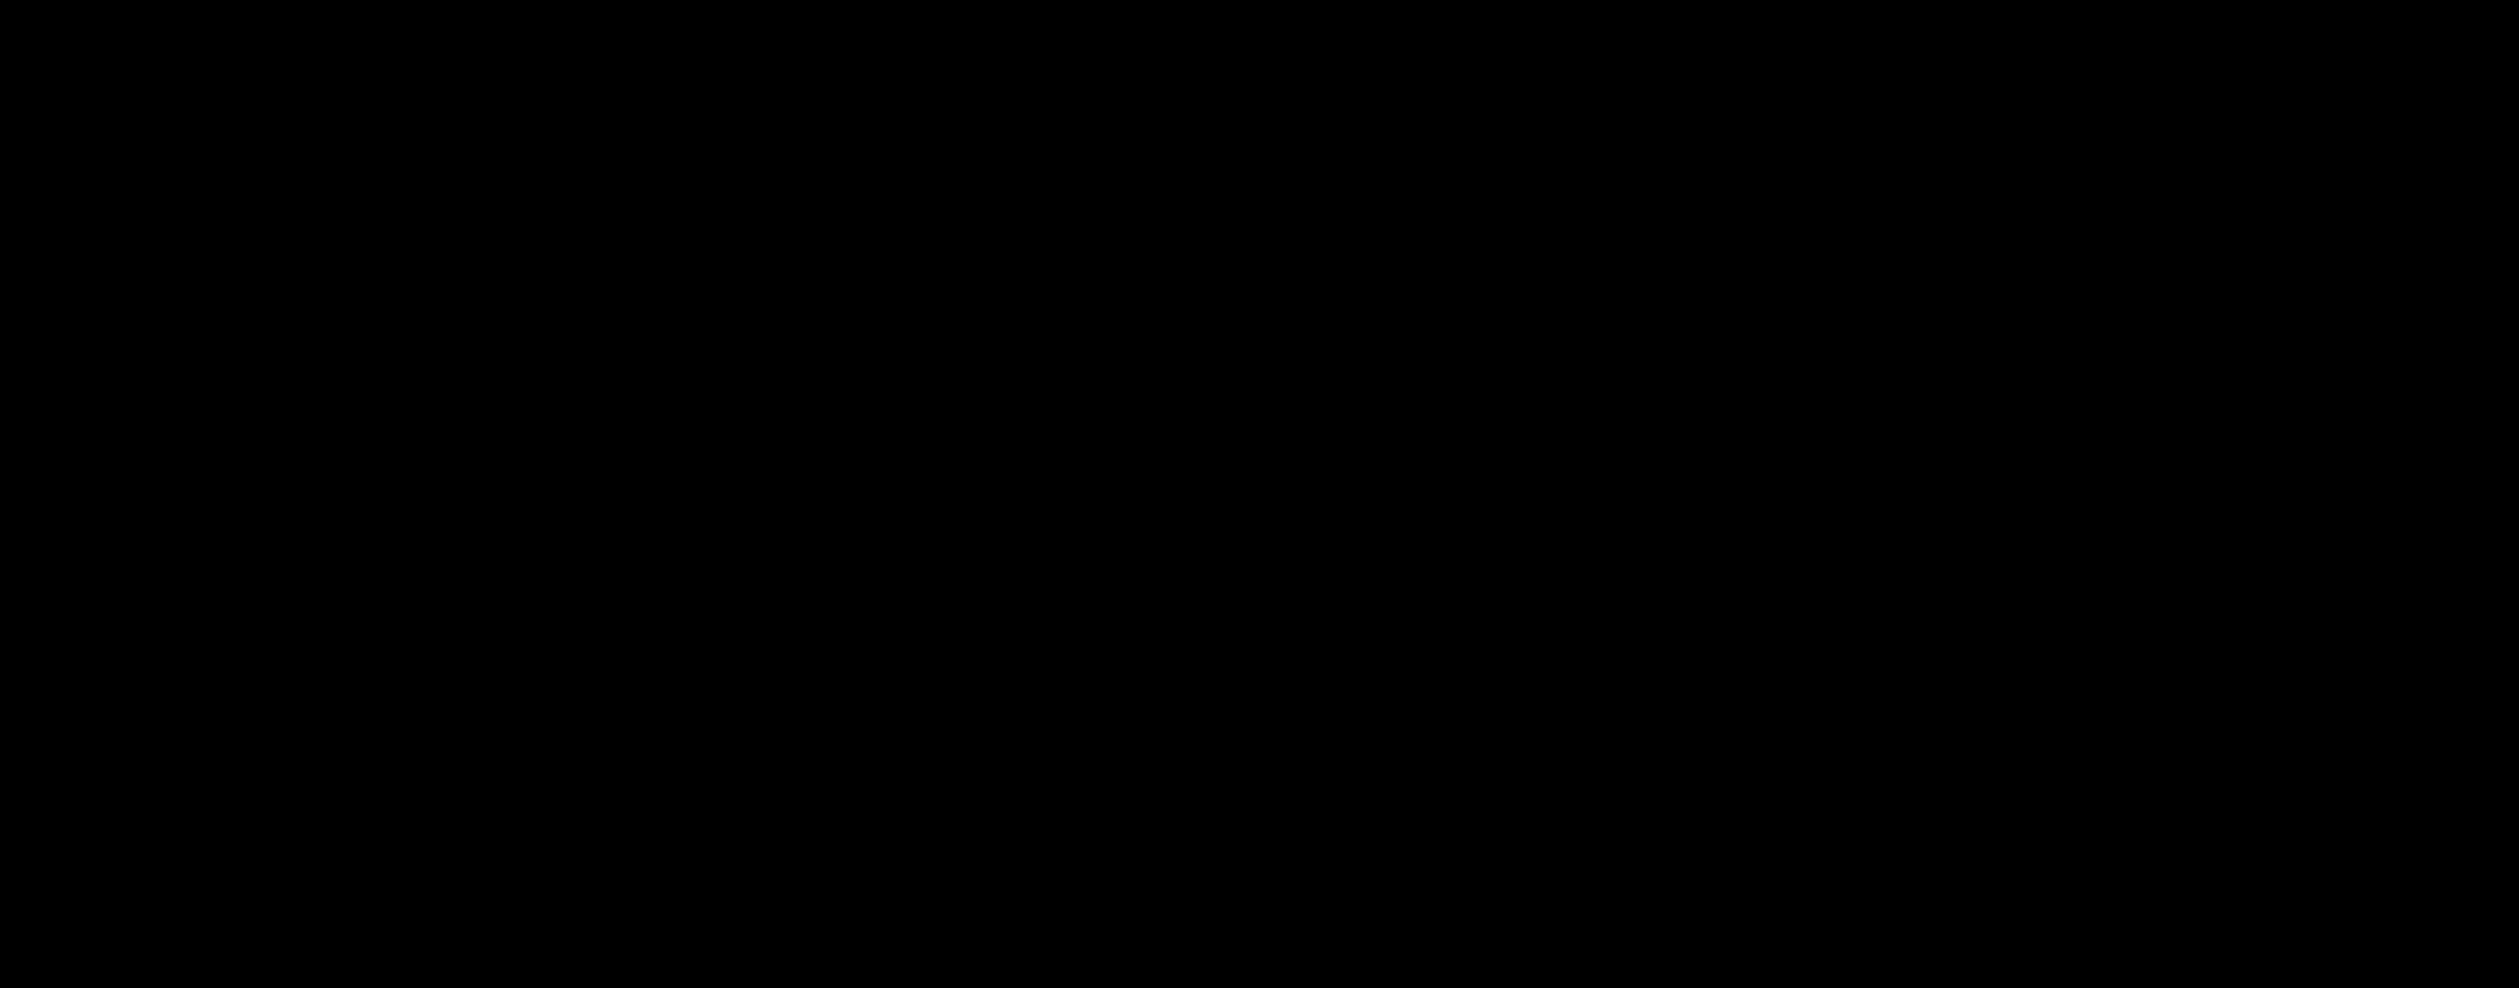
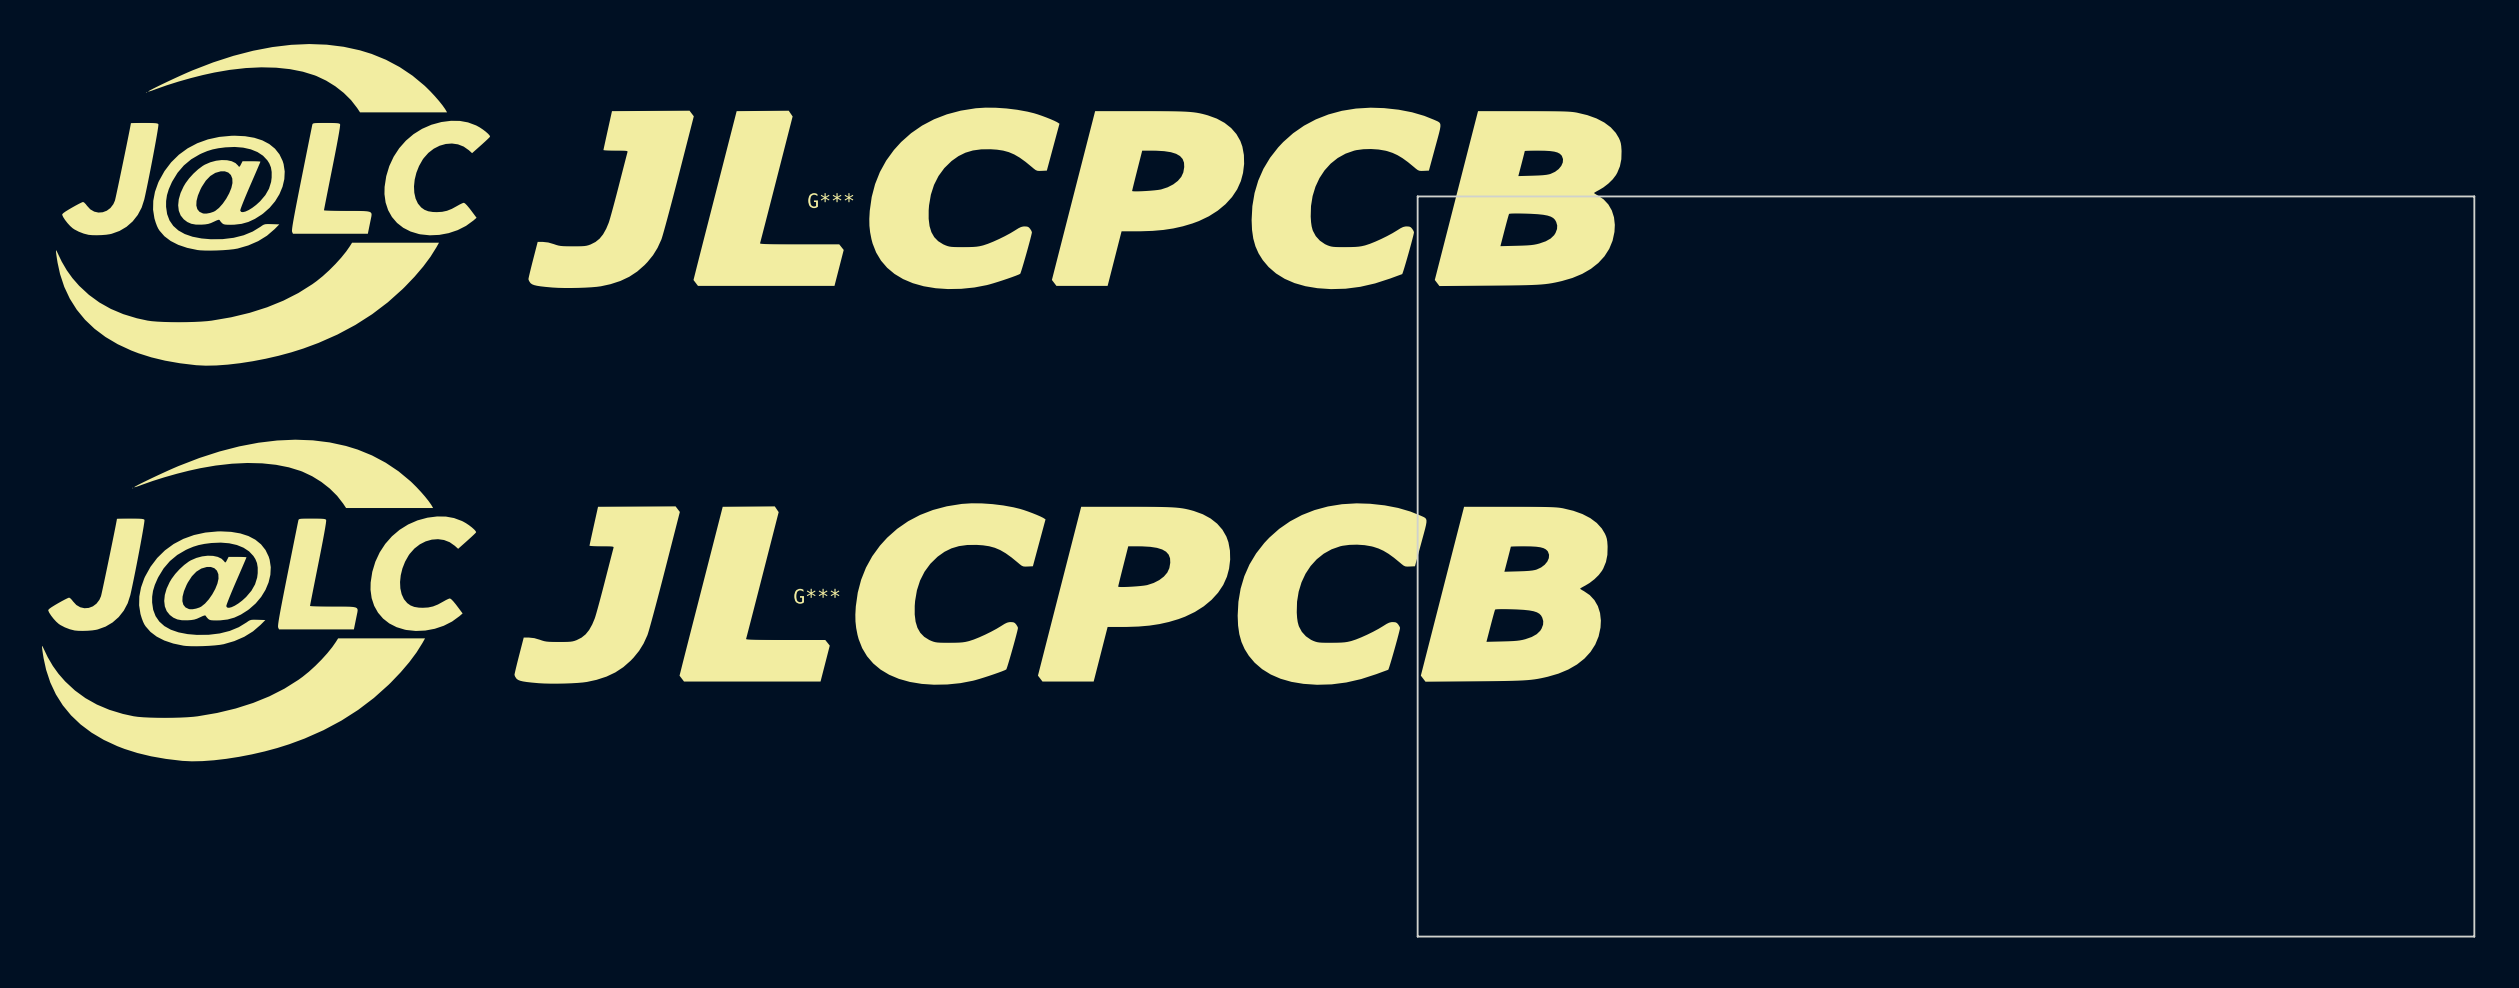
board edge: none -> (1417, 196) (2474, 196) (2474, 936) (1417, 936) (1417, 196)
G***: none -> (838, 204)
G***: none -> (824, 600)

